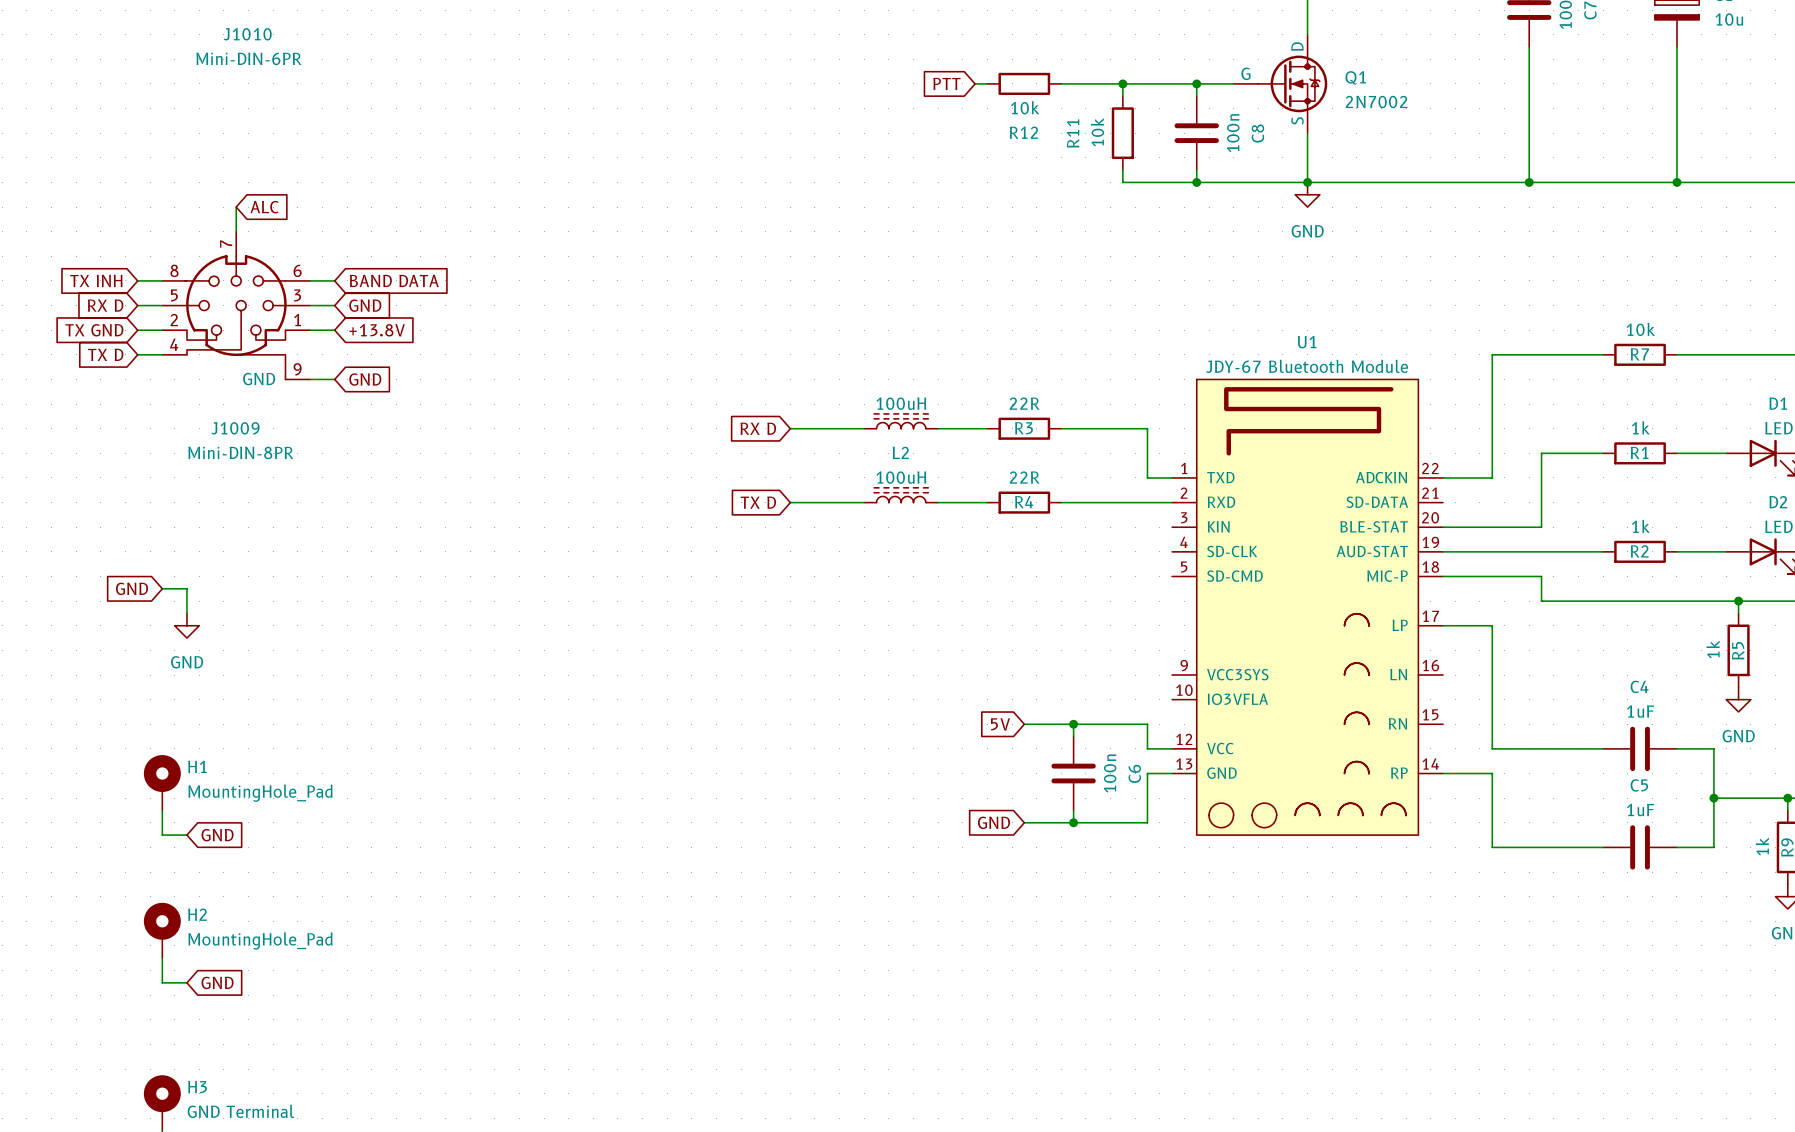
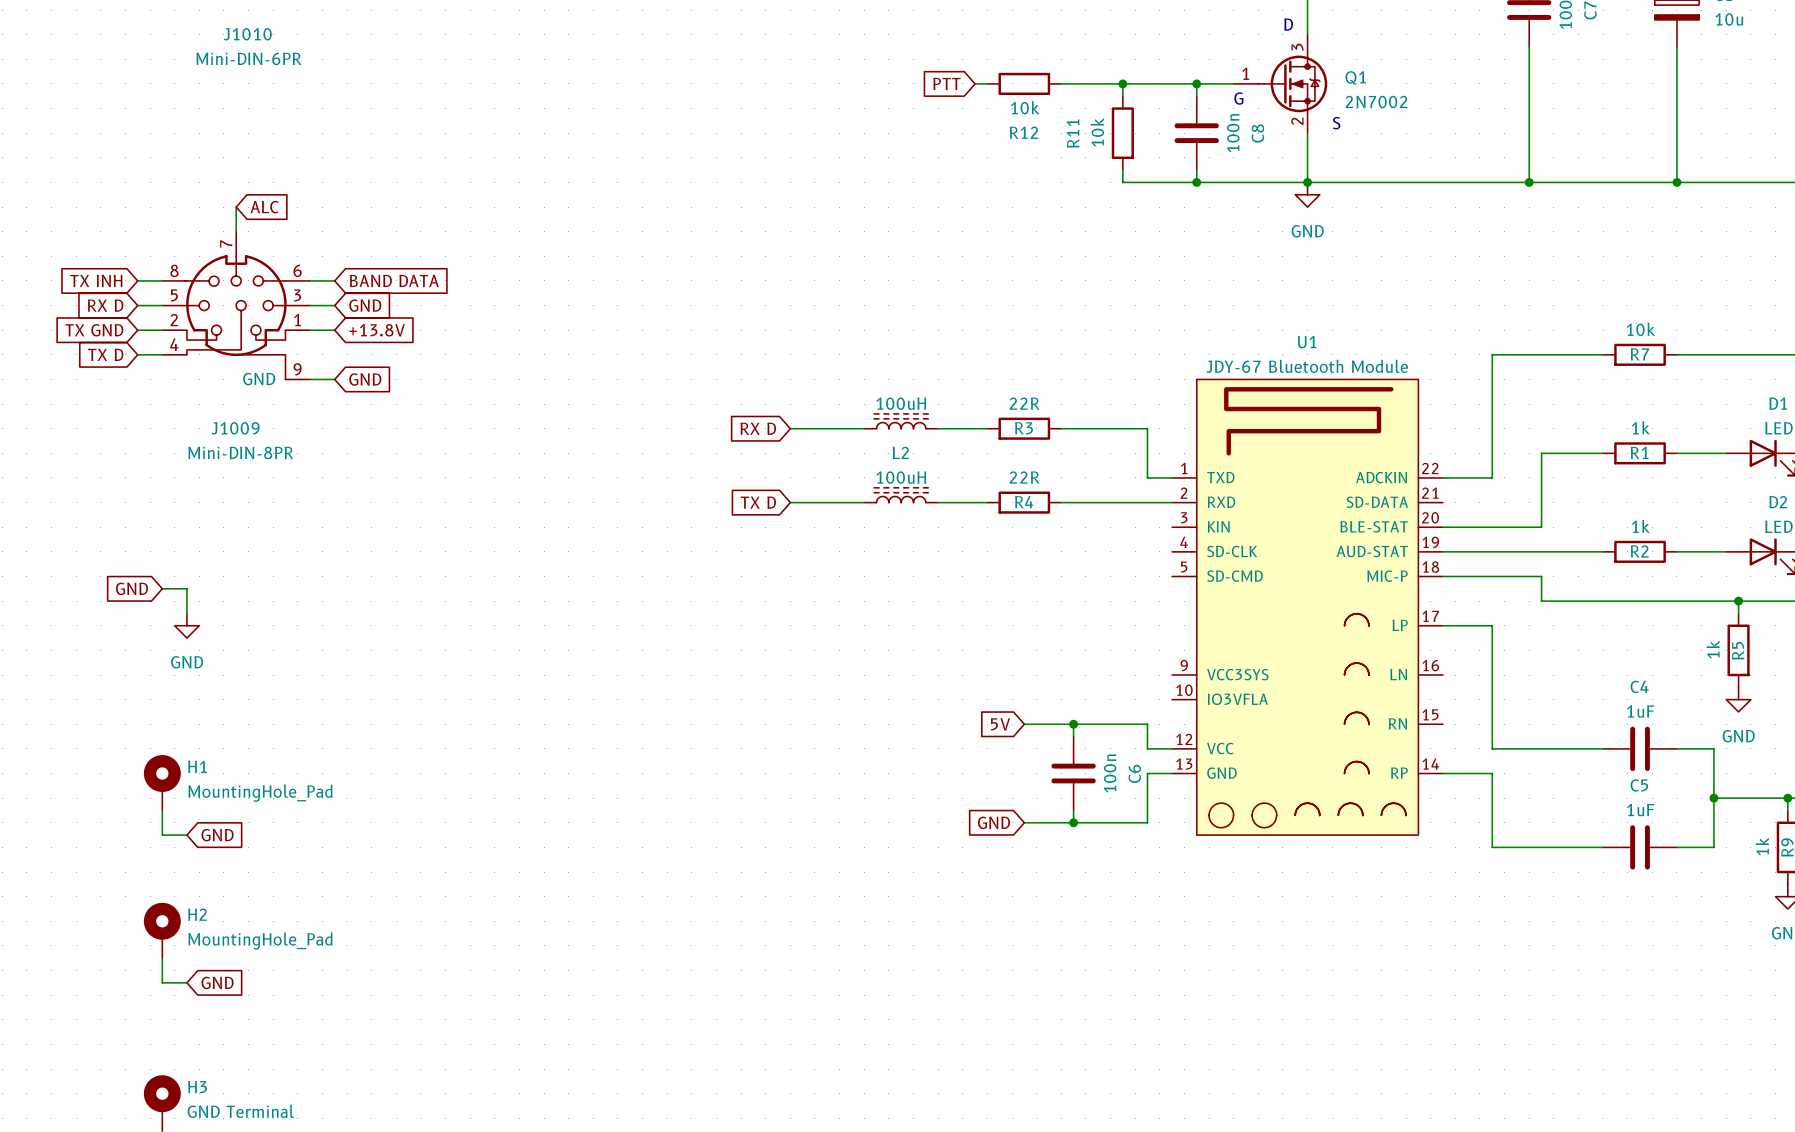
text: none -> D (1288, 24)
Q1 pin name: D (1297, 46) -> none
Q1 pin number: none -> 3 (1297, 47)
Q1 pin name: G (1245, 73) -> none
Q1 pin number: none -> 1 (1245, 73)
text: none -> G (1238, 98)
Q1 pin name: S (1297, 120) -> none
Q1 pin number: none -> 2 (1297, 121)
text: none -> S (1336, 123)

